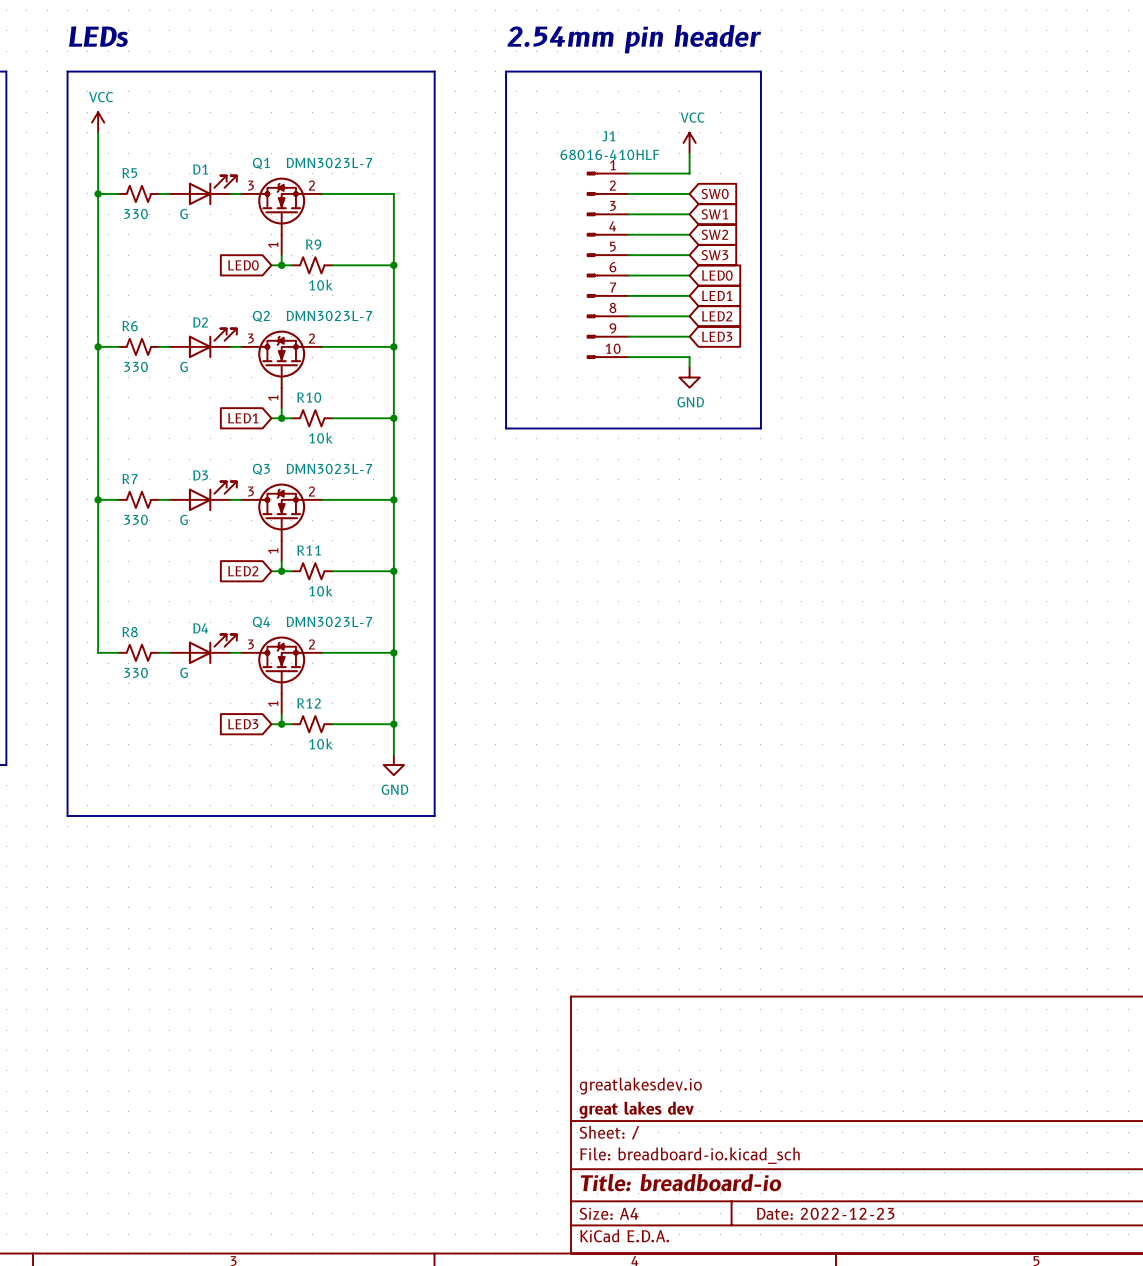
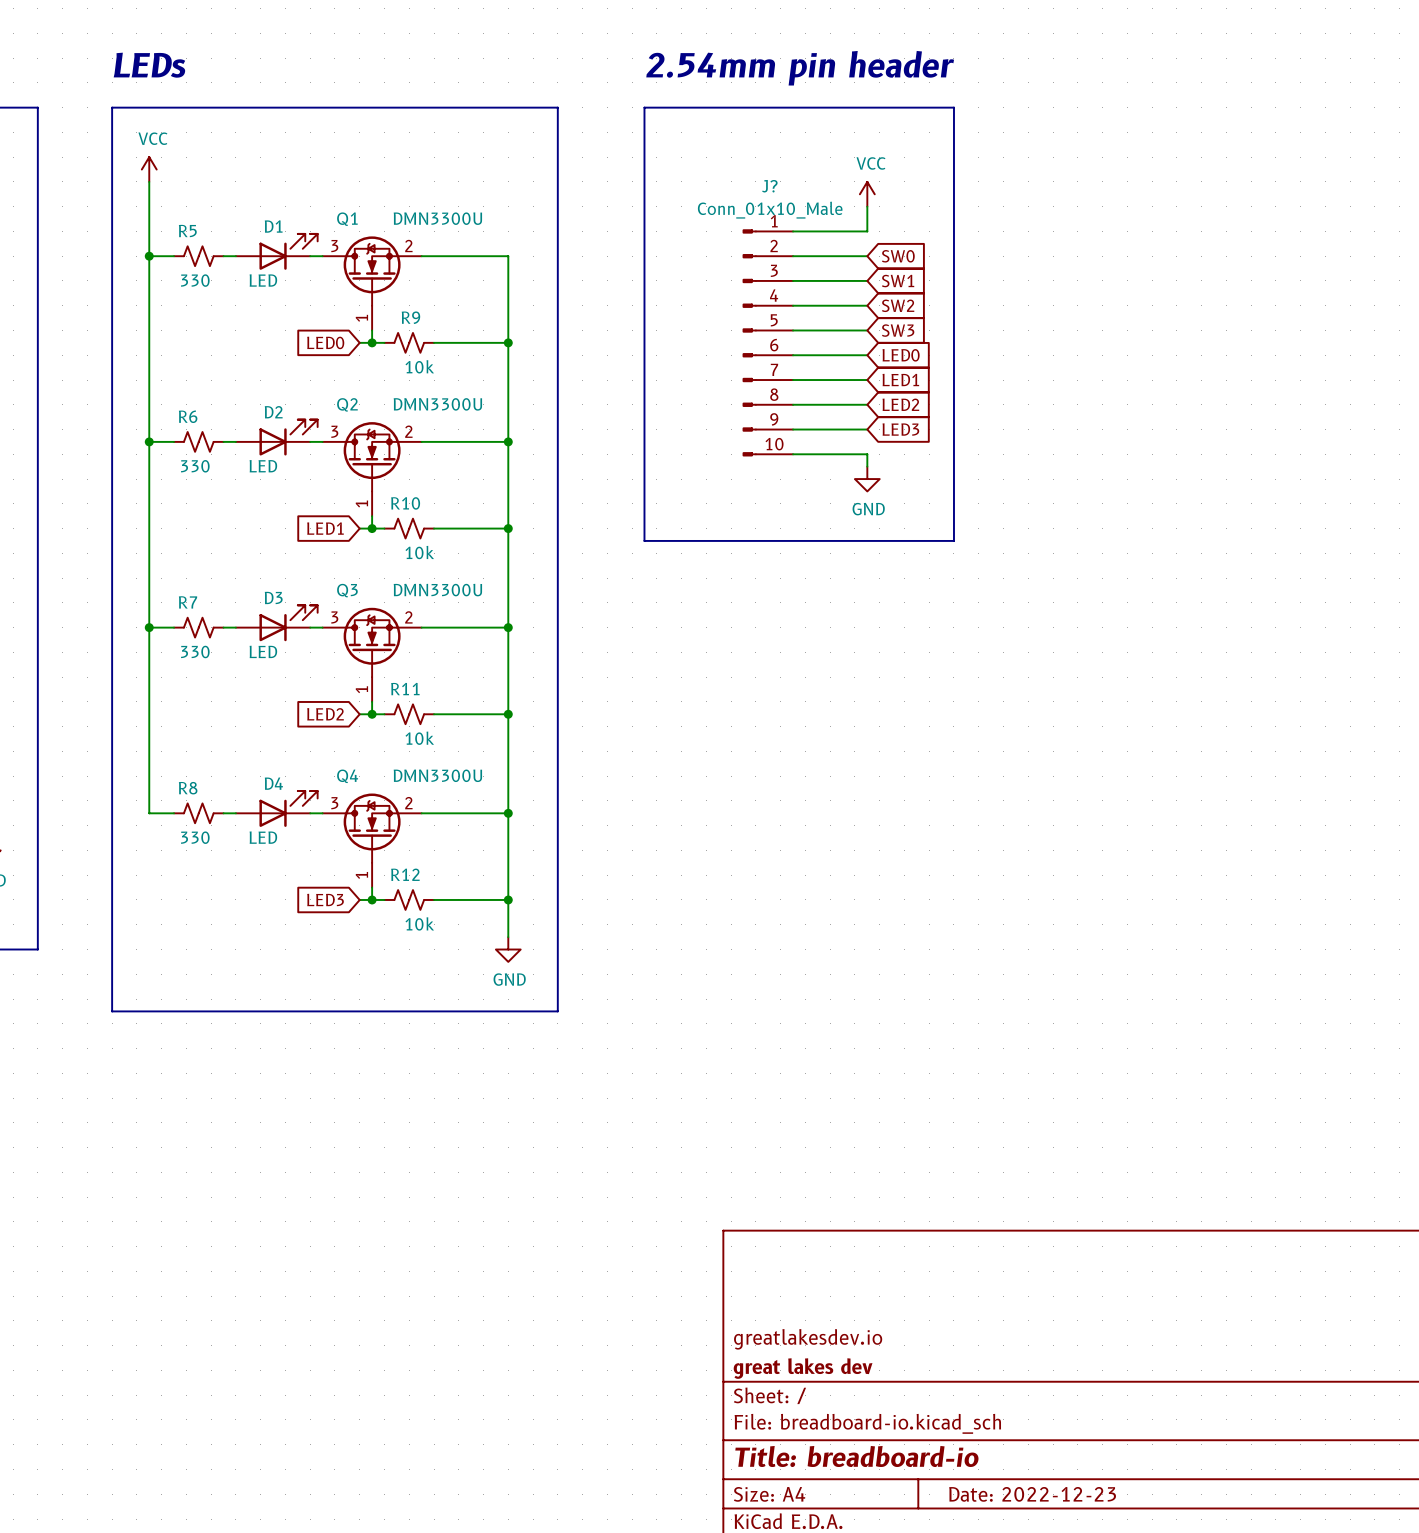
J1 name: J1 (608, 136) -> J? (769, 186)
J1 value: 68016-410HLF (609, 154) -> Conn_01x10_Male (770, 210)
Q1 value: DMN3023L-7 (329, 163) -> DMN3300U (437, 218)
D1 value: G (184, 214) -> LED (263, 280)
Q2 value: DMN3023L-7 (329, 315) -> DMN3300U (437, 404)
D2 value: G (184, 366) -> LED (263, 466)
Q3 value: DMN3023L-7 (329, 468) -> DMN3300U (437, 590)
D3 value: G (184, 519) -> LED (263, 651)
Q4 value: DMN3023L-7 (329, 621) -> DMN3300U (437, 775)
D4 value: G (184, 672) -> LED (263, 837)

